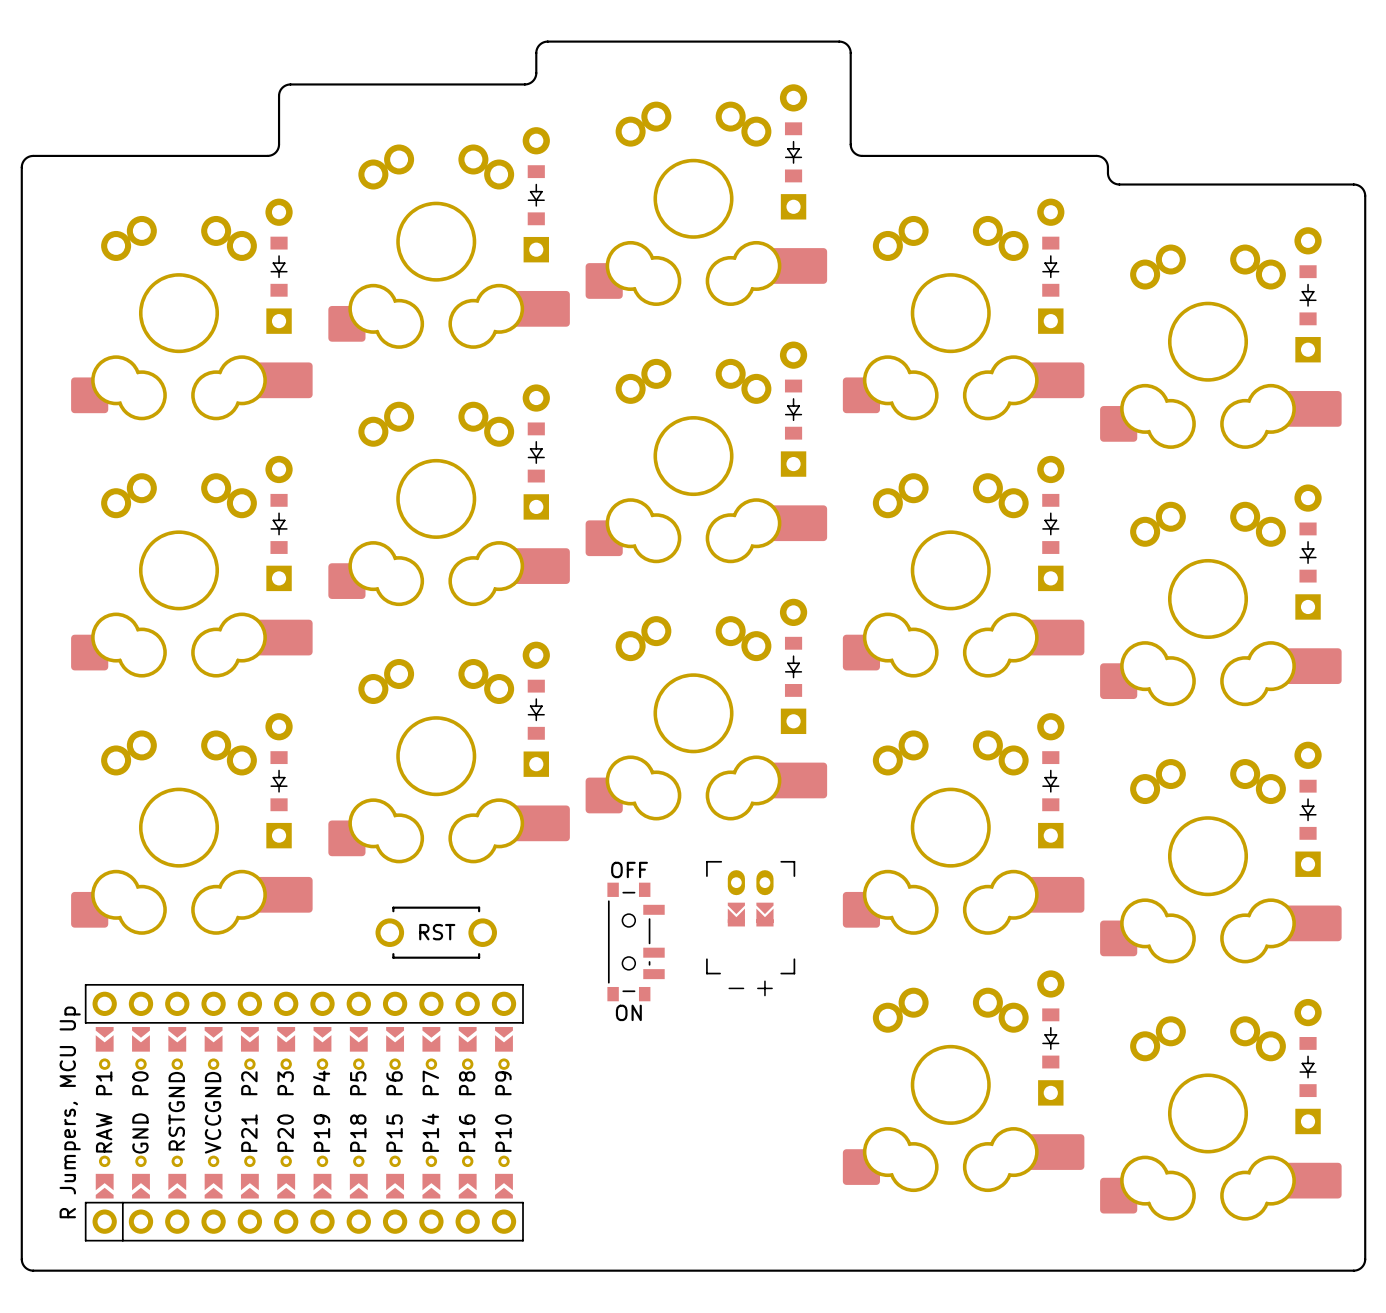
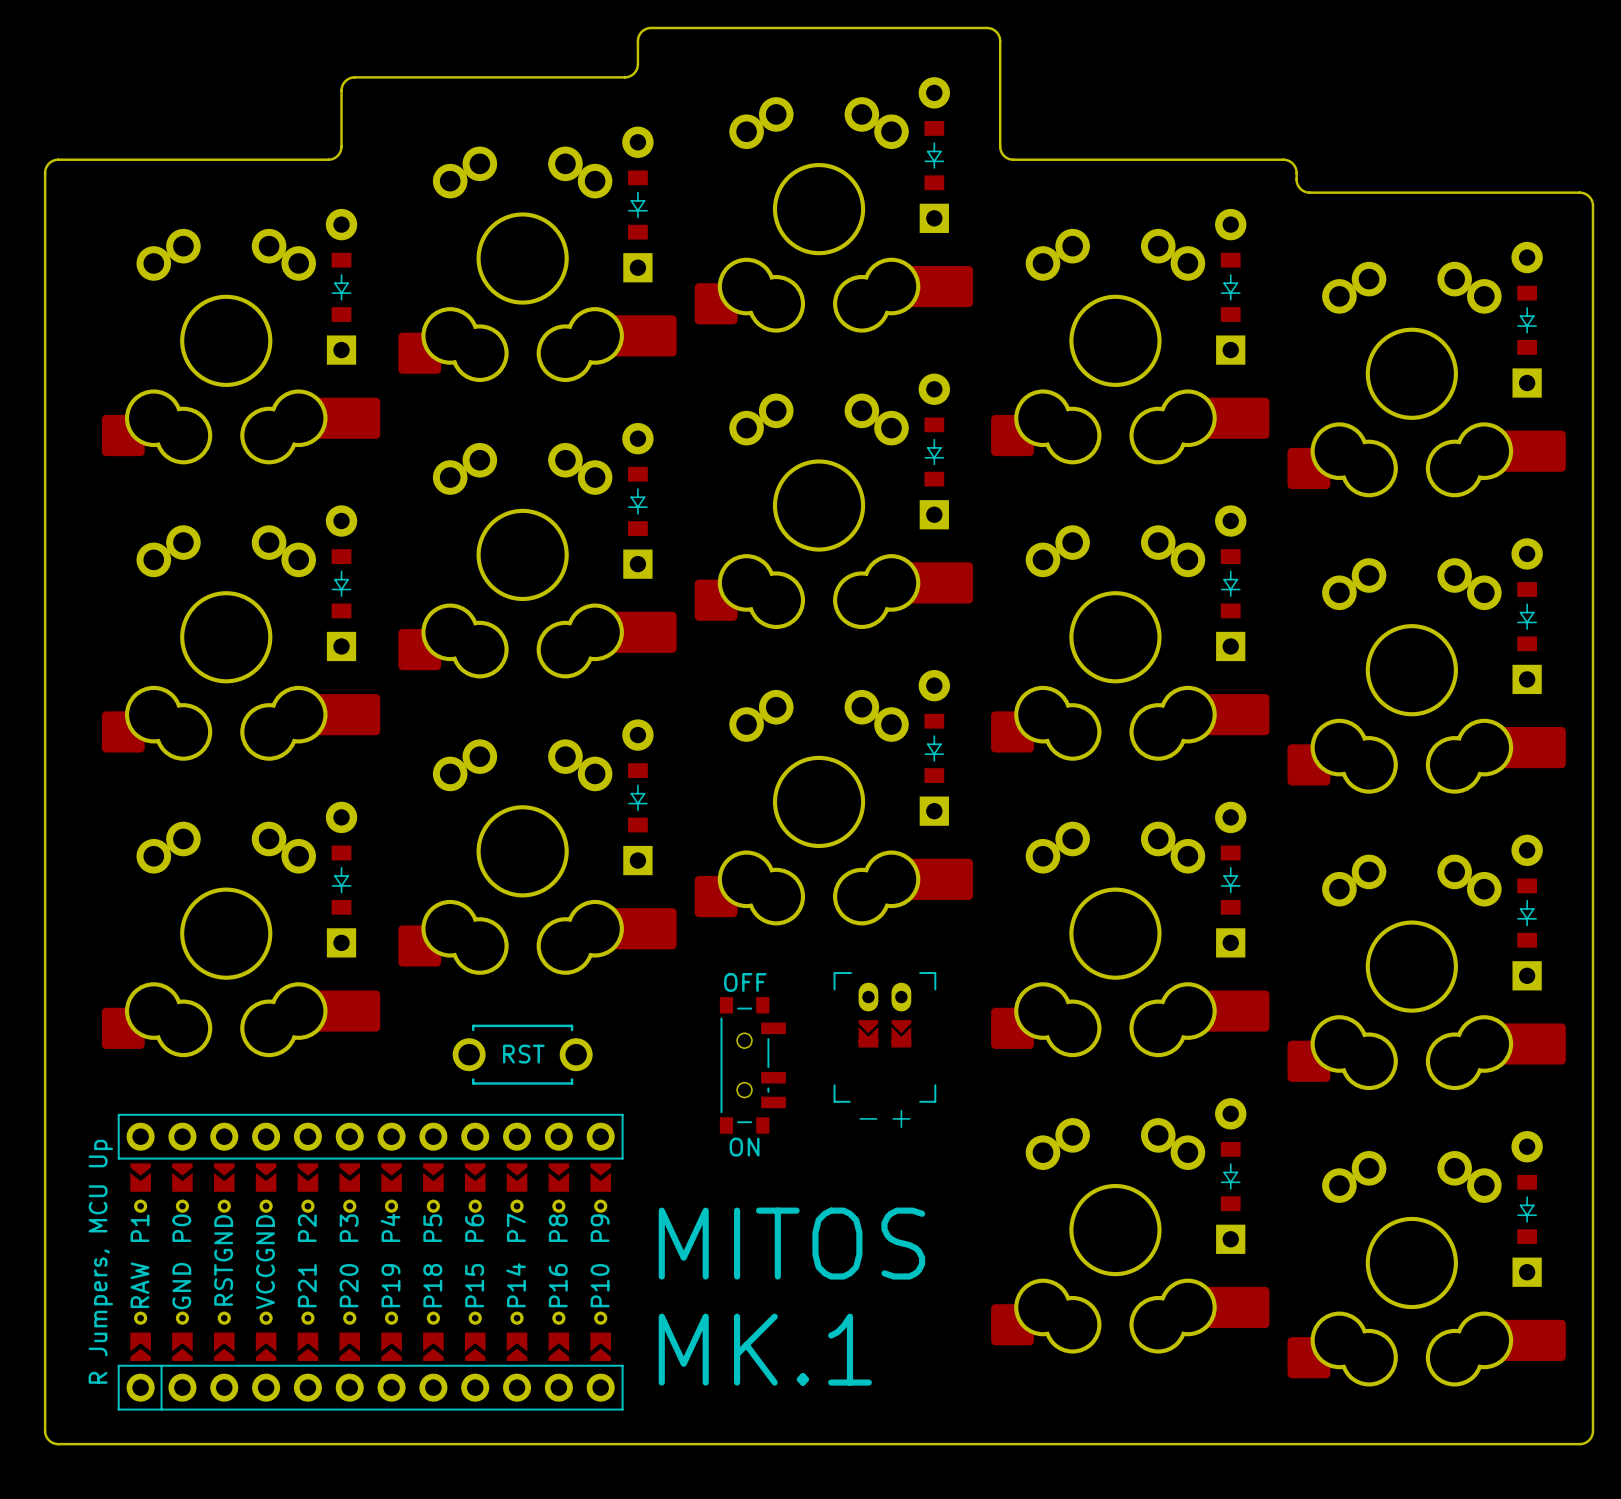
text: none -> MITOS (791, 1243)
text: none -> MK.1 (765, 1349)

